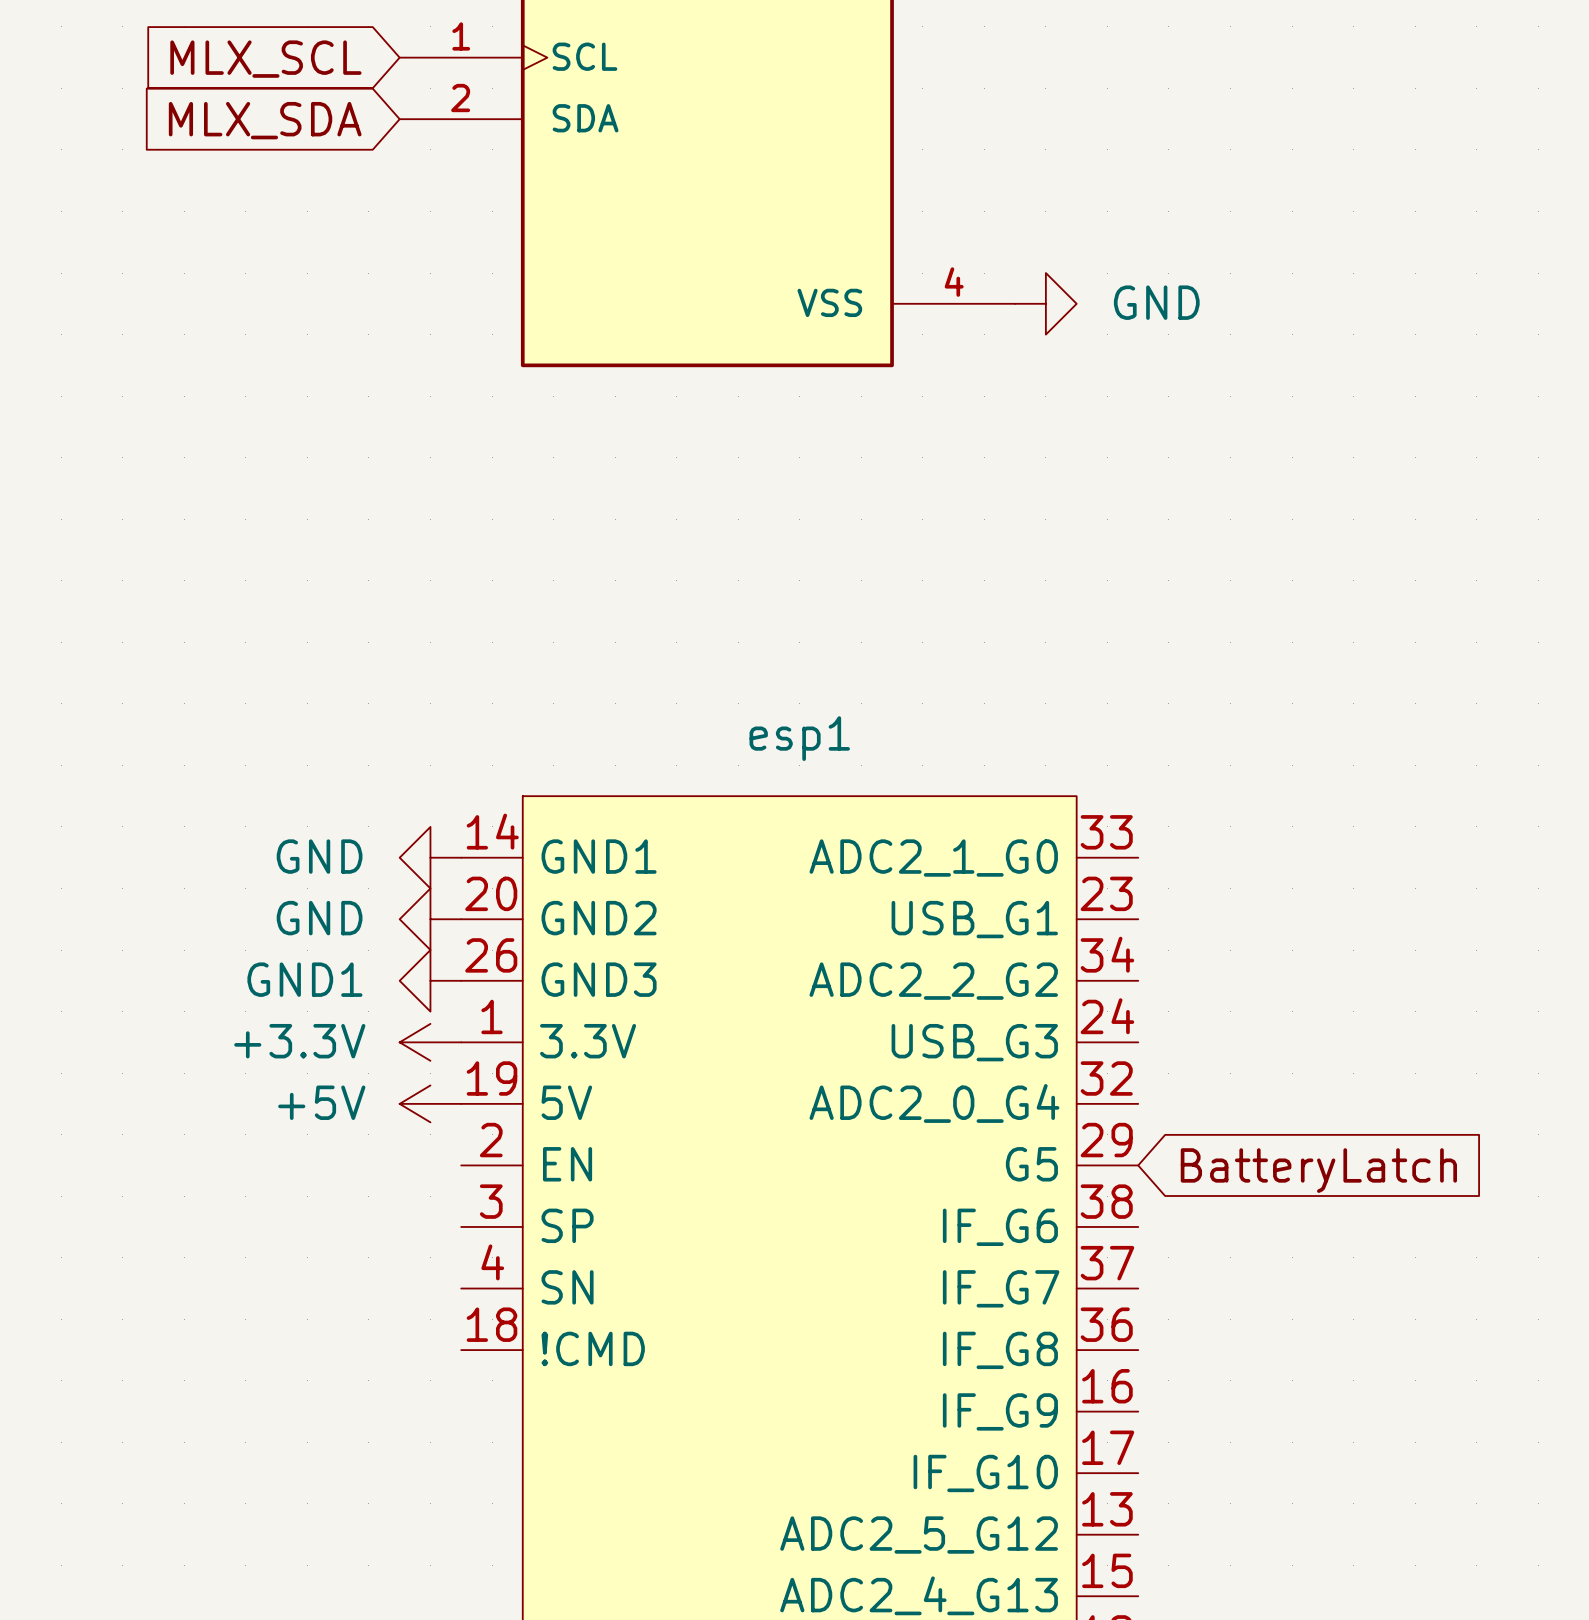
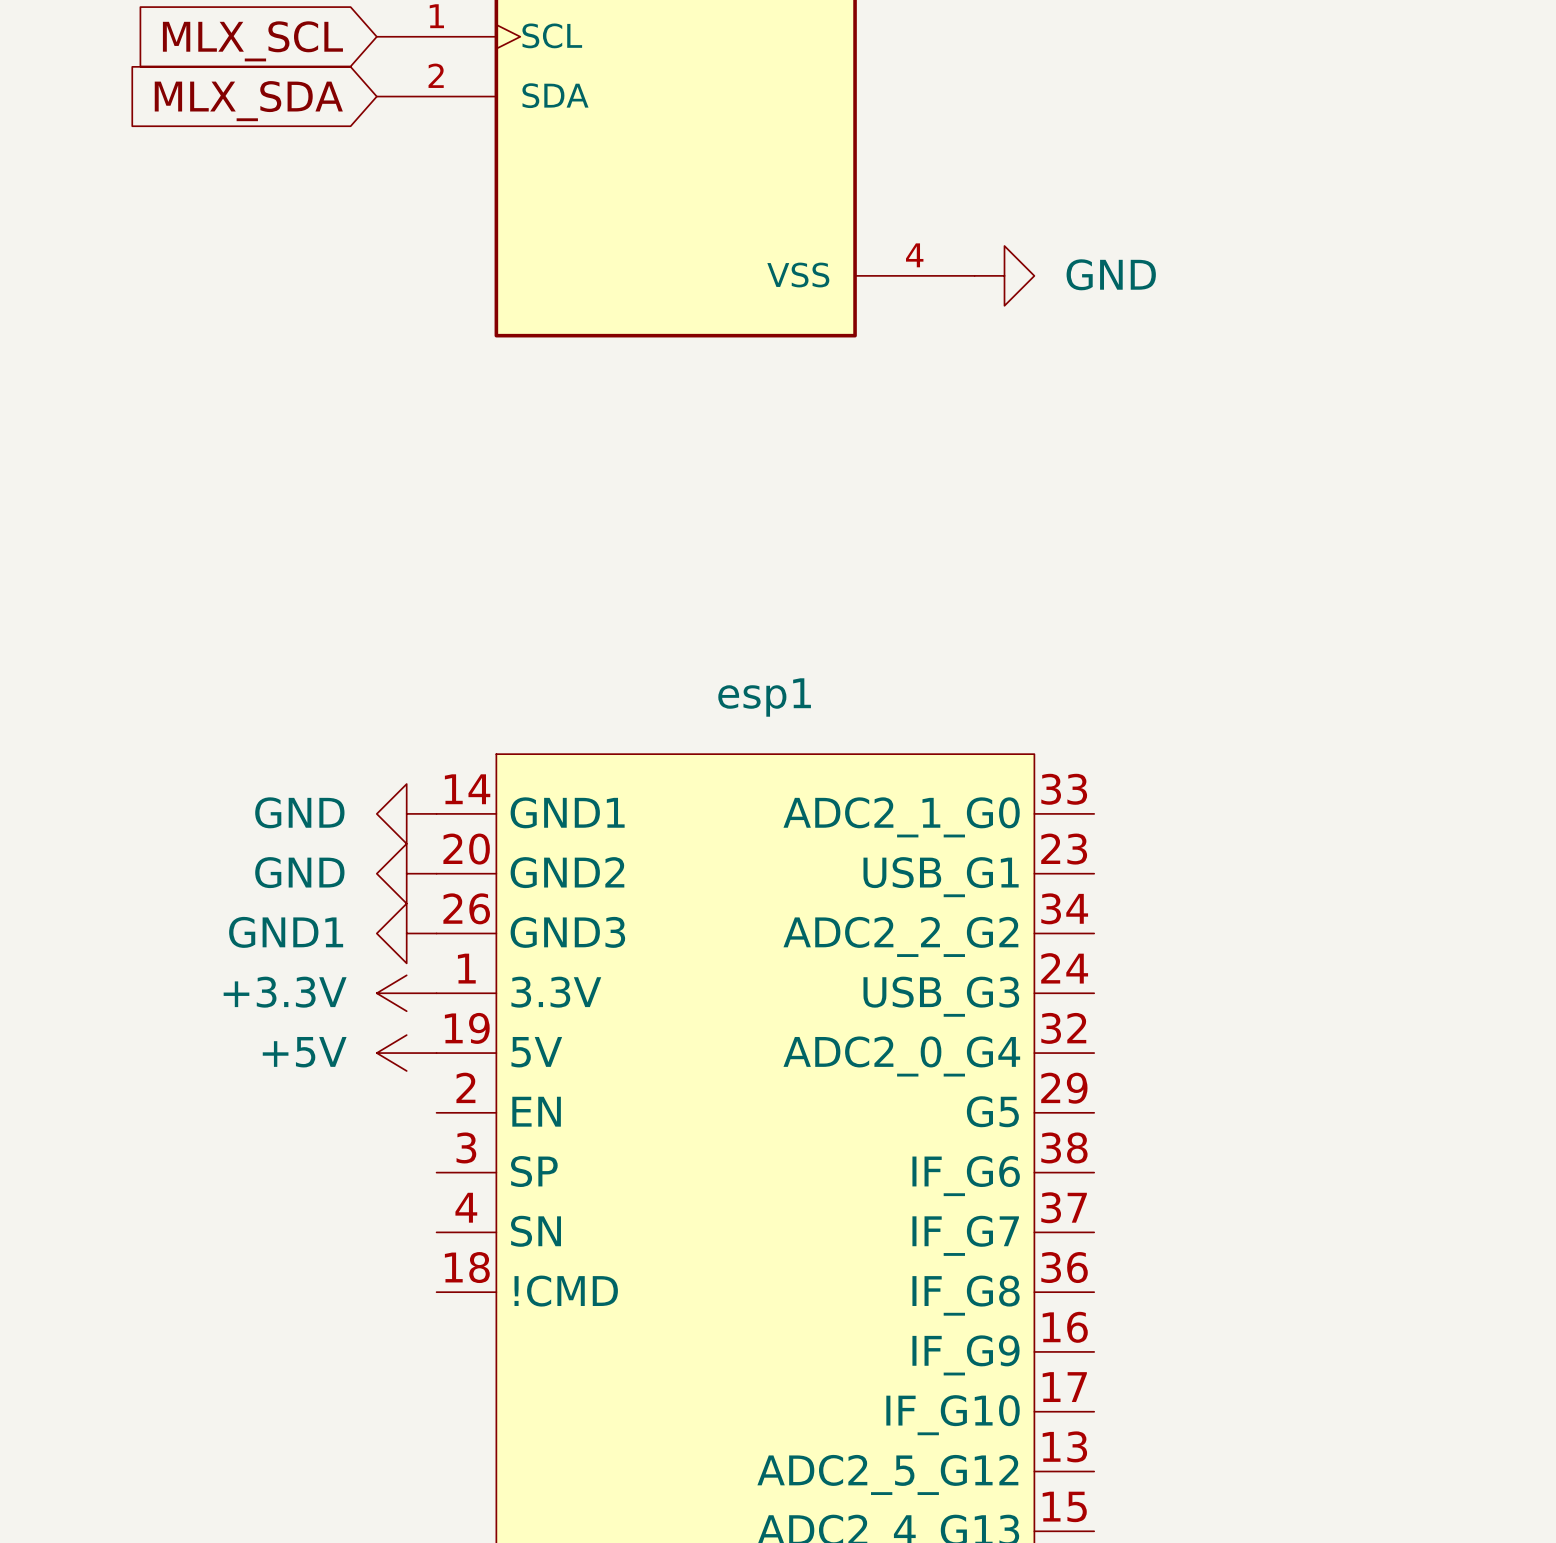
global label: BatteryLatch (1318, 1170) -> none

